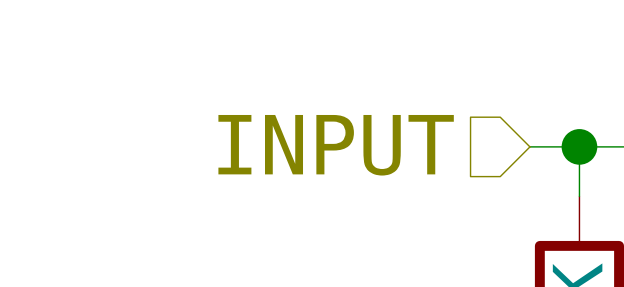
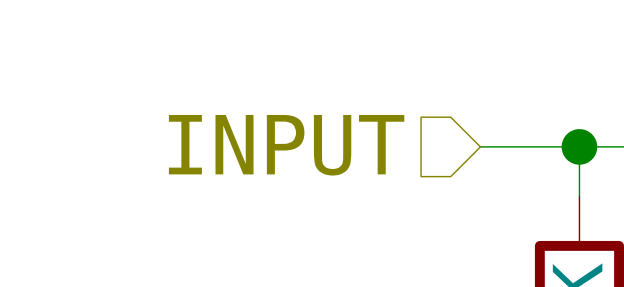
hierarchical label position: INPUT (336, 145) -> INPUT (286, 145)
wire: none -> (480, 146) (529, 146)

